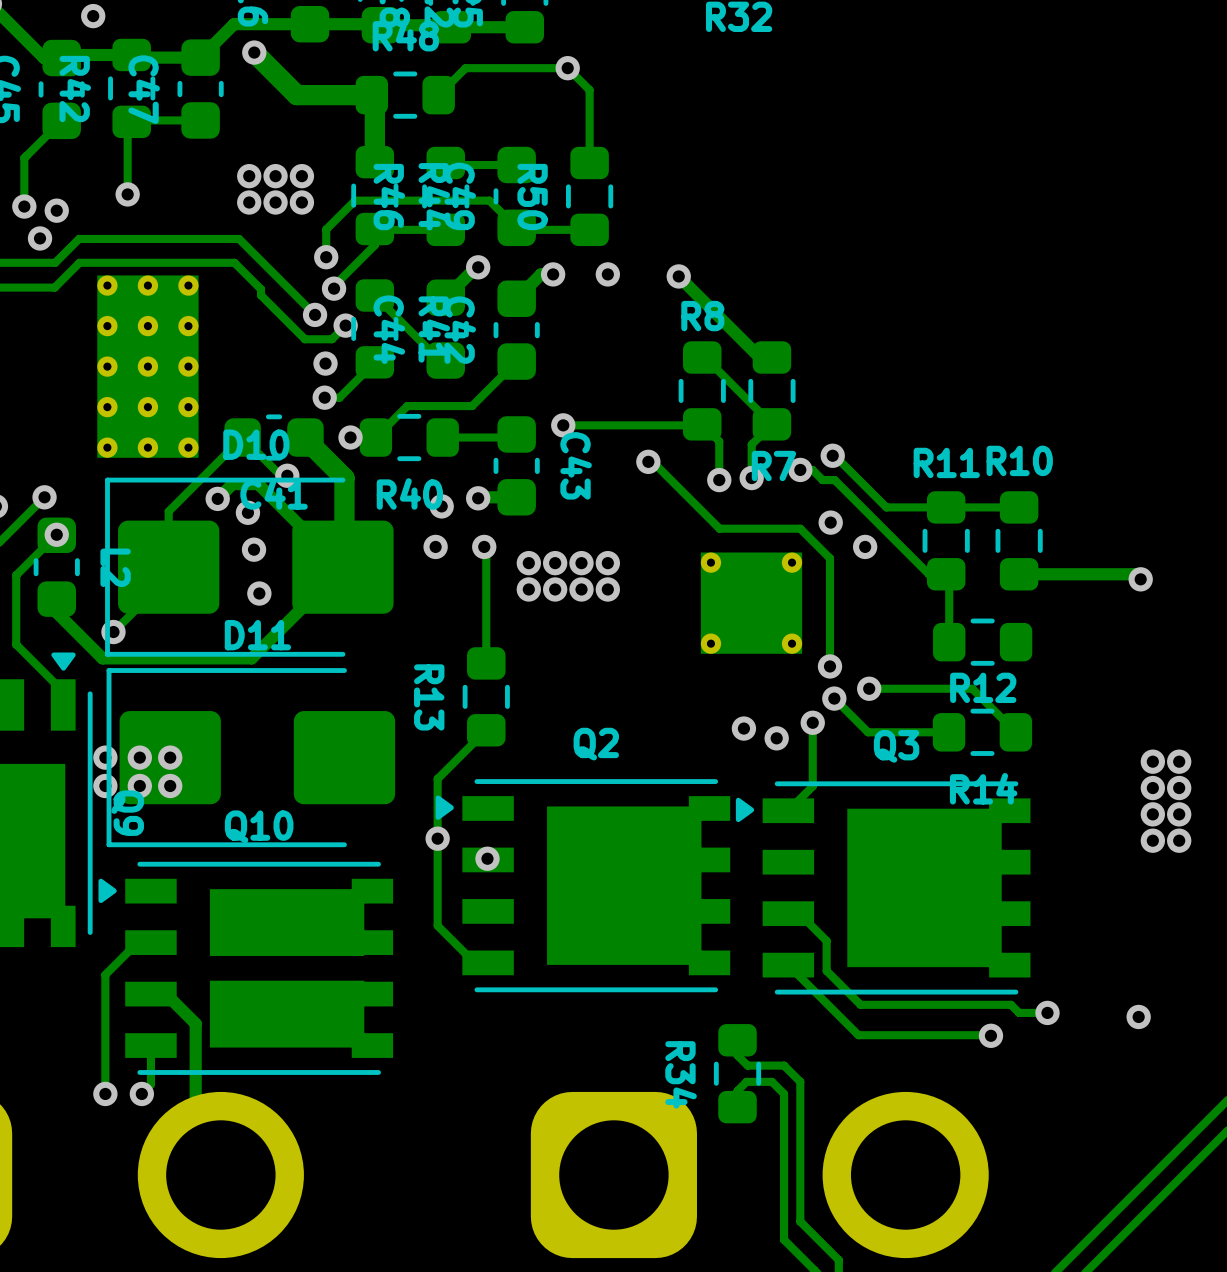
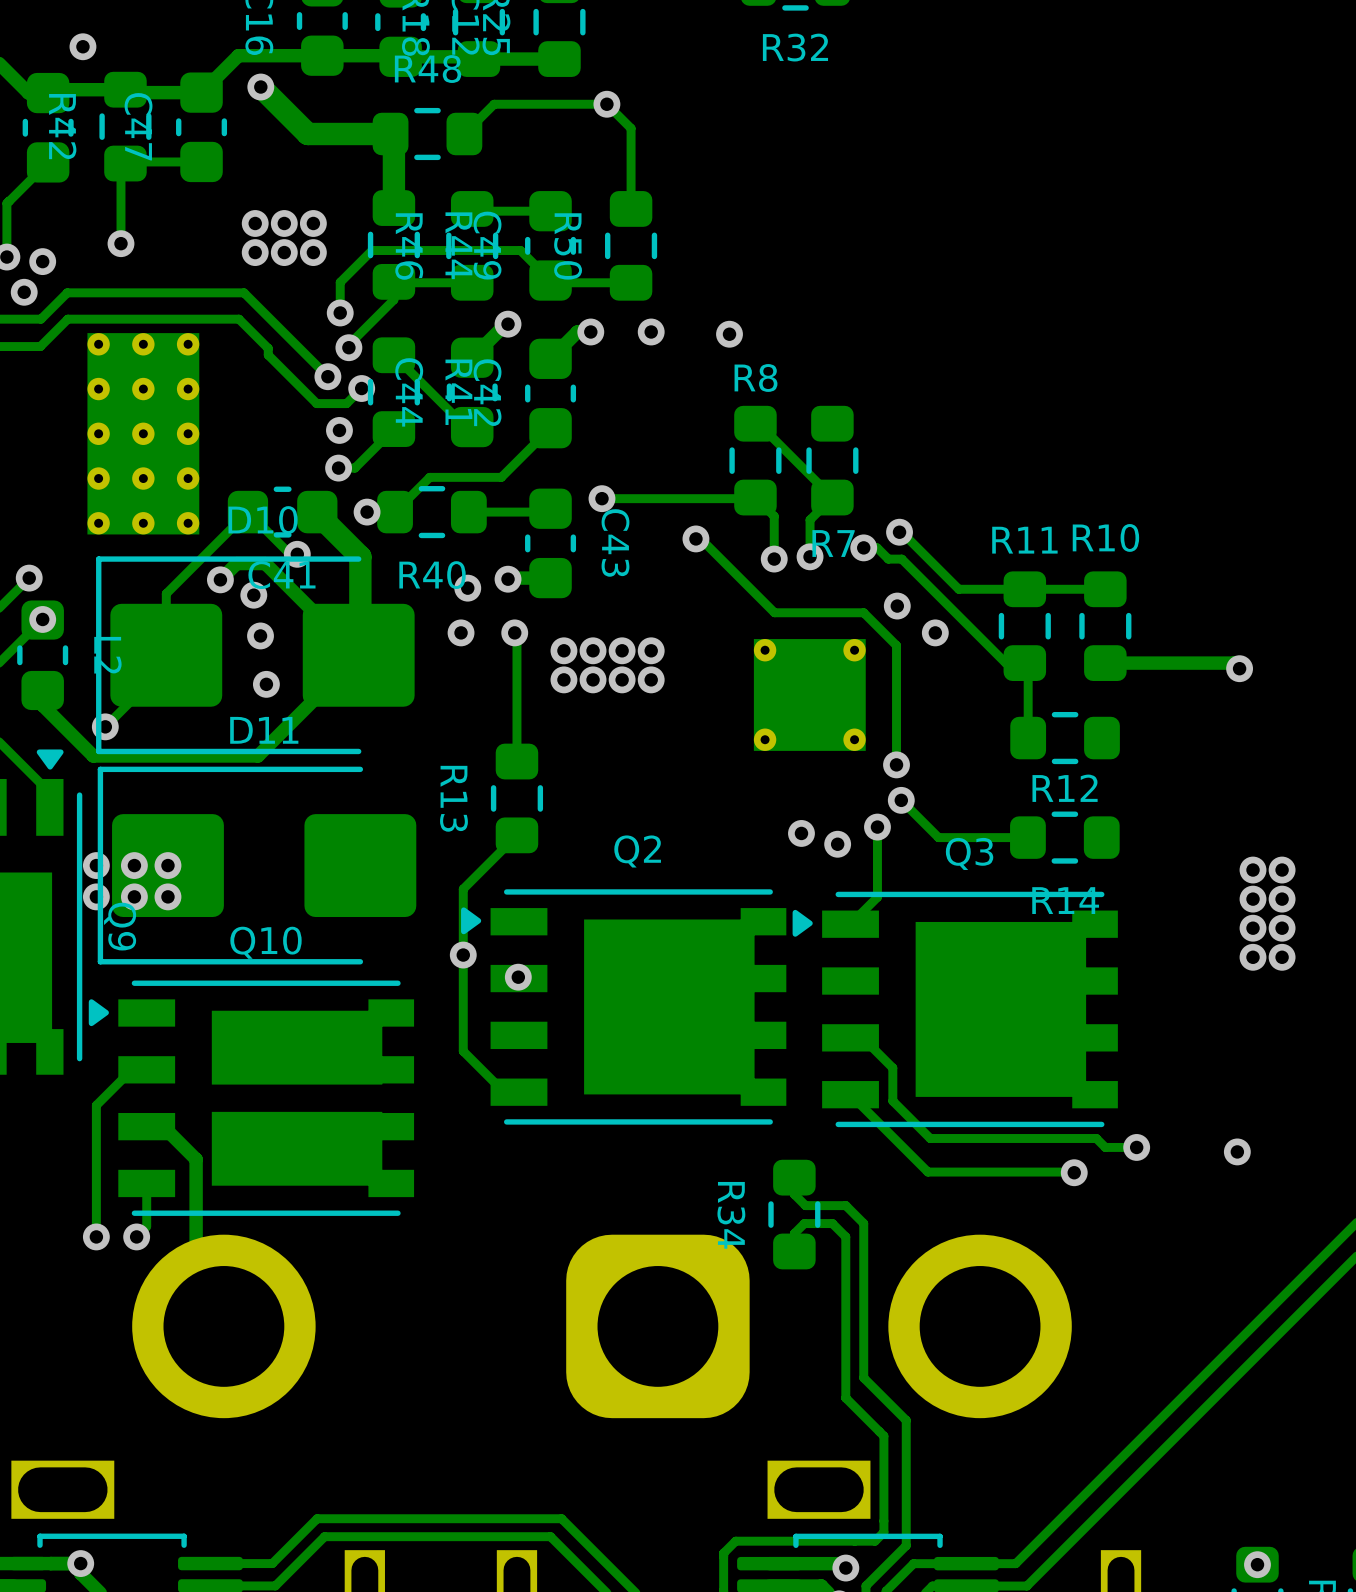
track: (678, 276) (759, 357) (771, 357) -> none
track: (869, 688) (972, 688) (1015, 732) -> none
via: (869, 688) -> none

